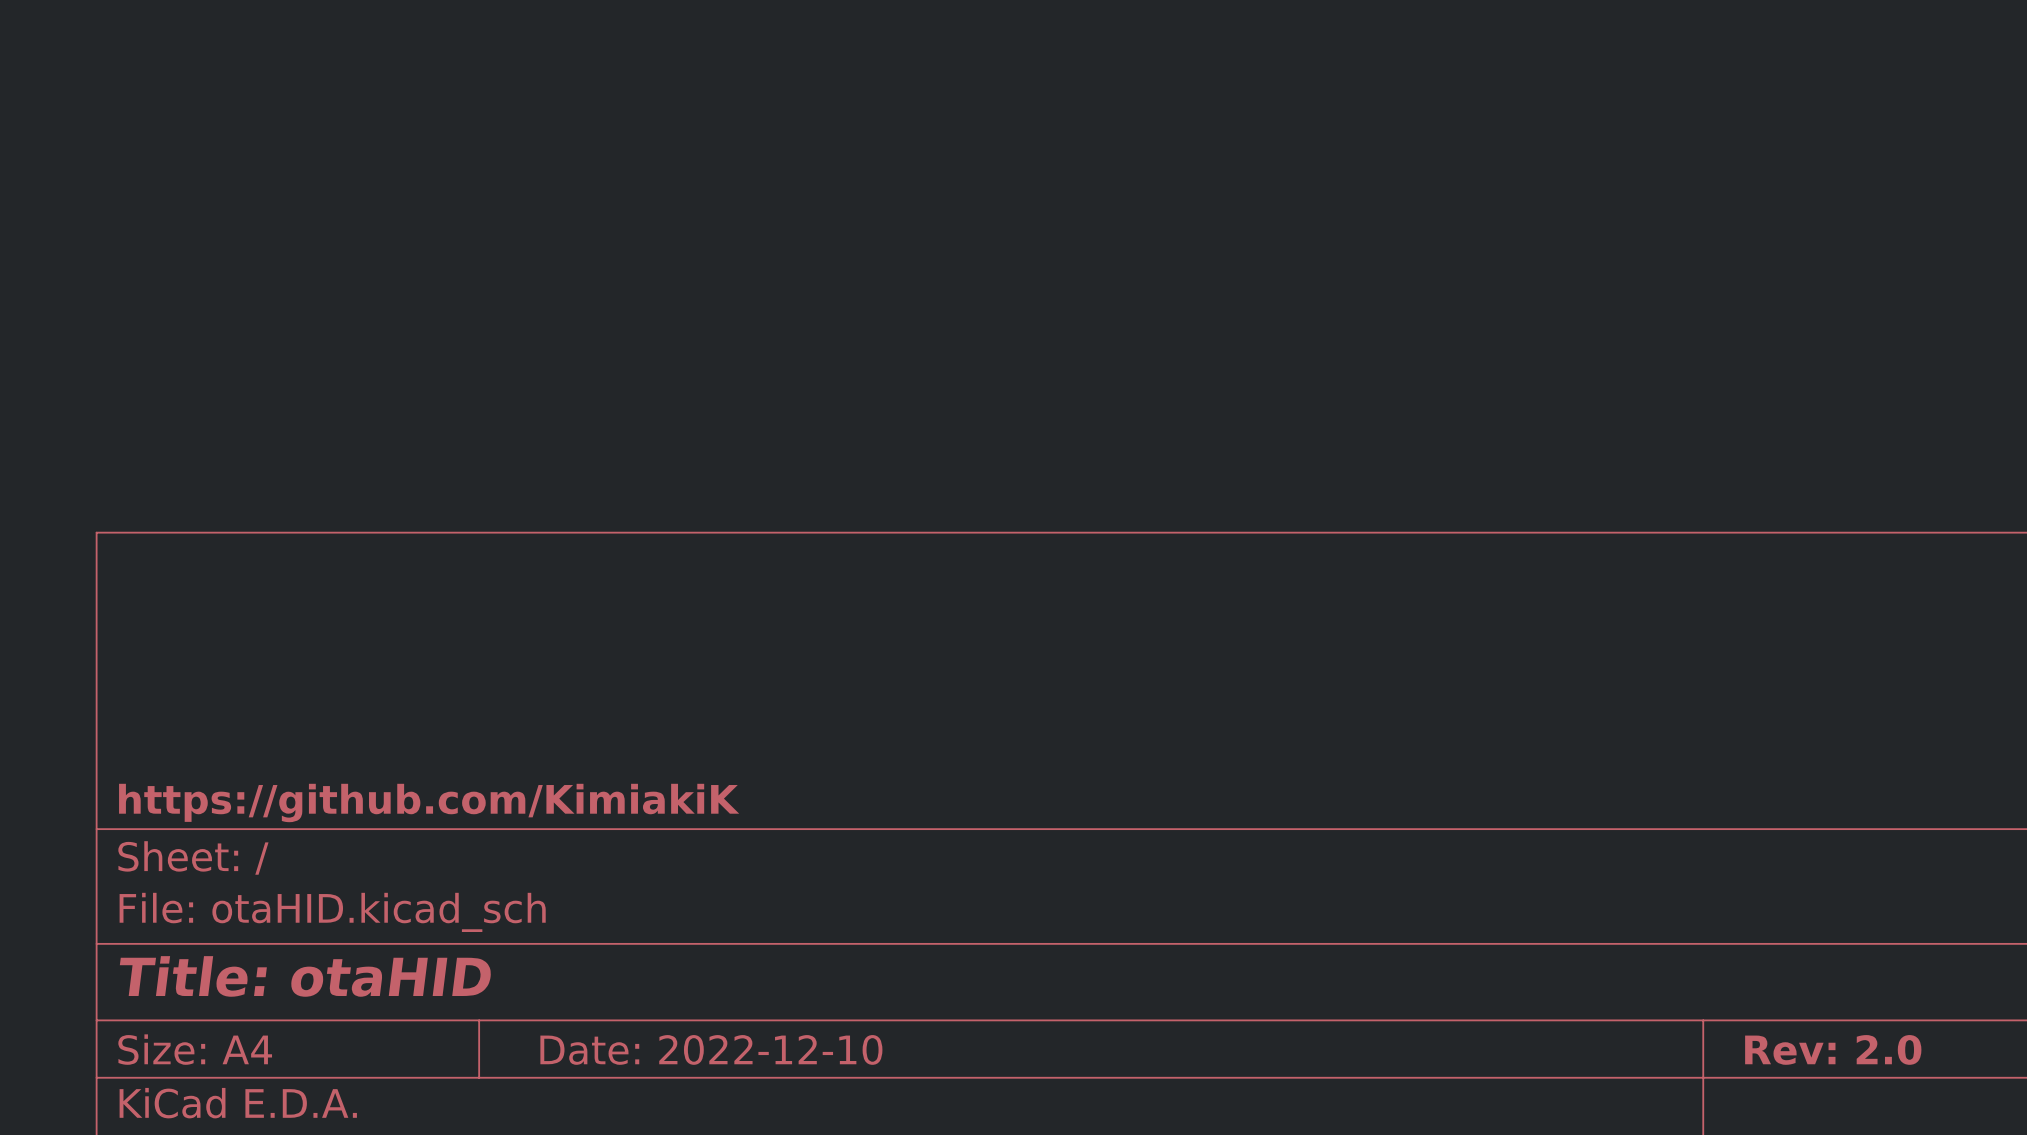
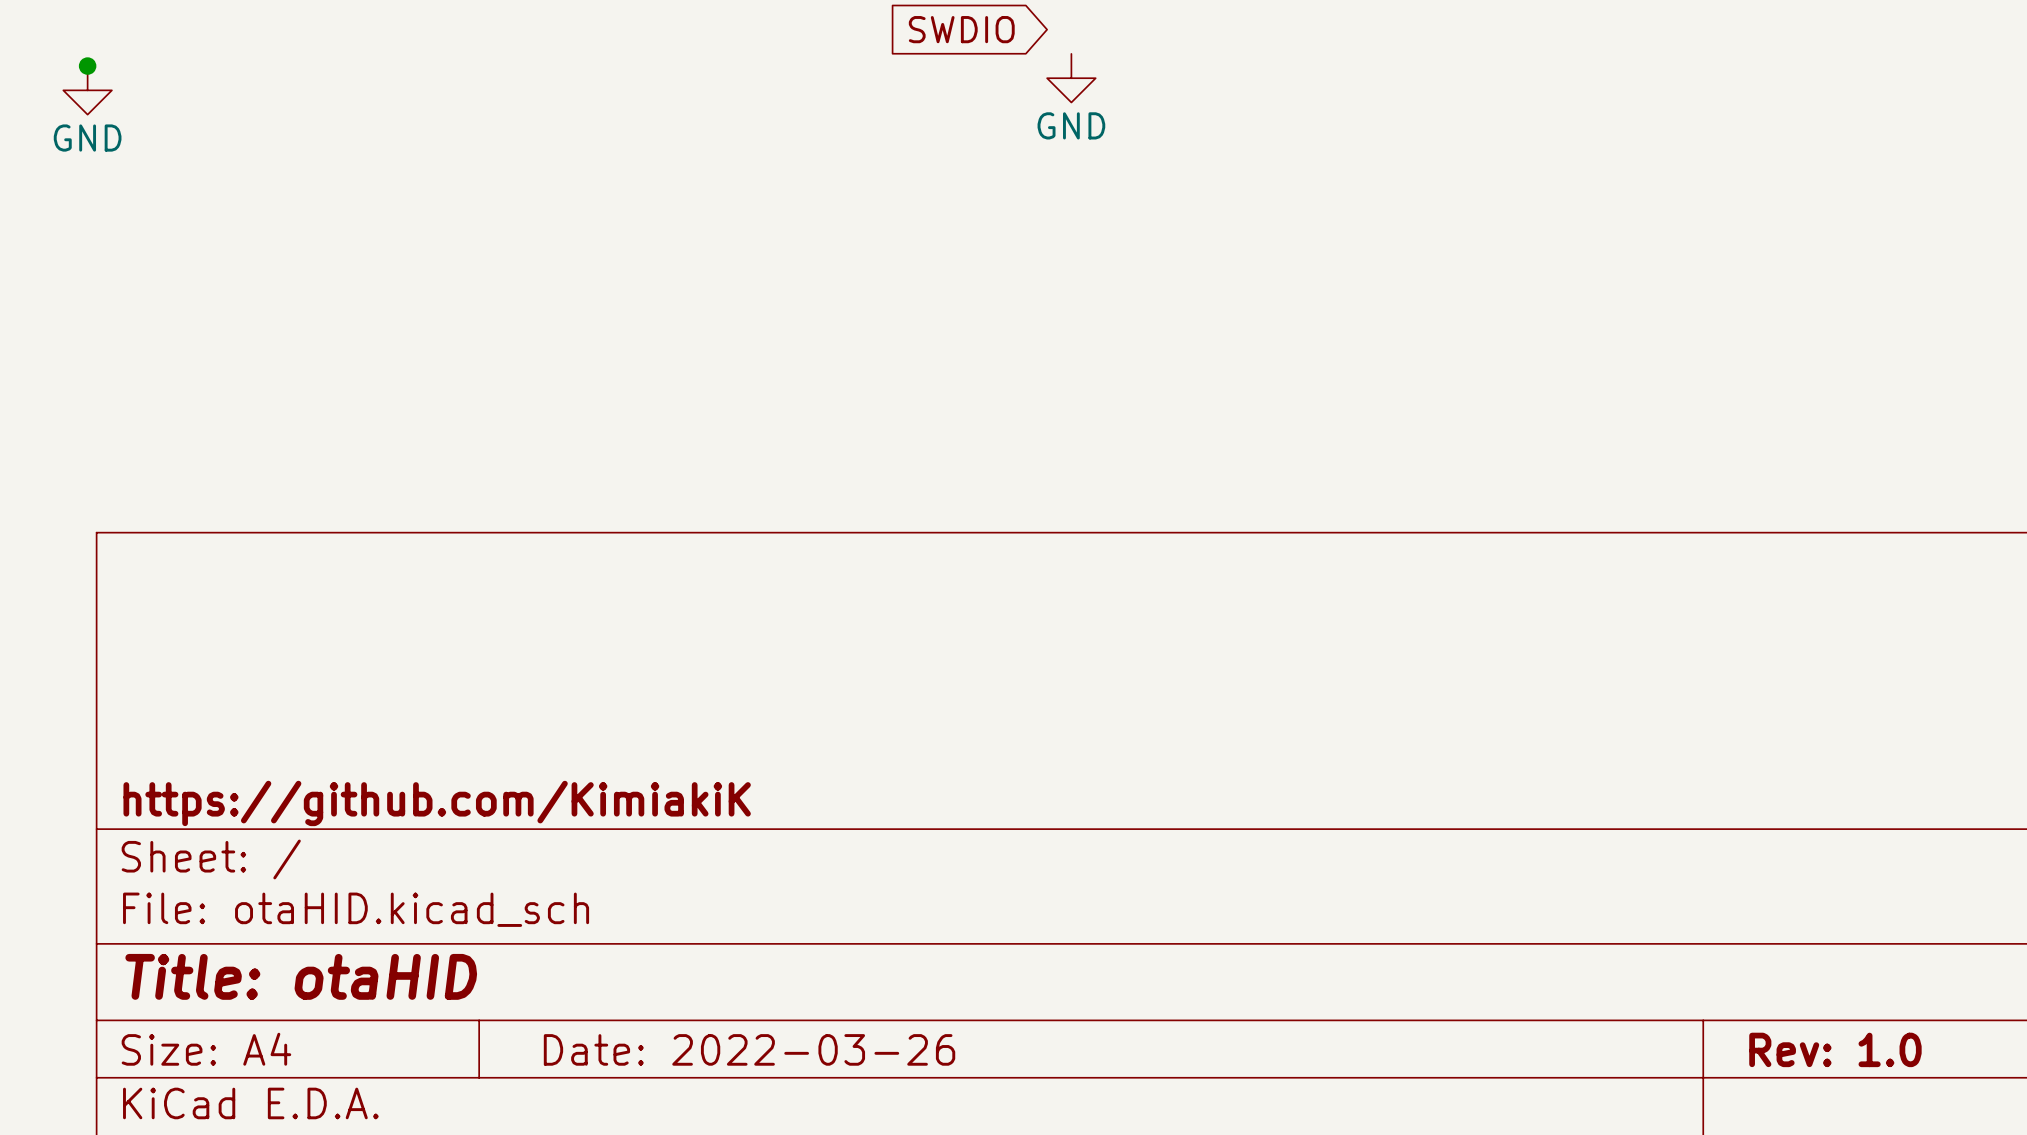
global label: none -> SWDIO (961, 29)
junction: none -> (87, 66)
power symbol: none -> GND (1071, 78)
power symbol: none -> GND (87, 90)
title block: Date: 2022-12-10 (711, 1049) -> Date: 2022-03-26 (749, 1049)
title block: Rev: 2.0 (1833, 1049) -> Rev: 1.0 (1835, 1049)

